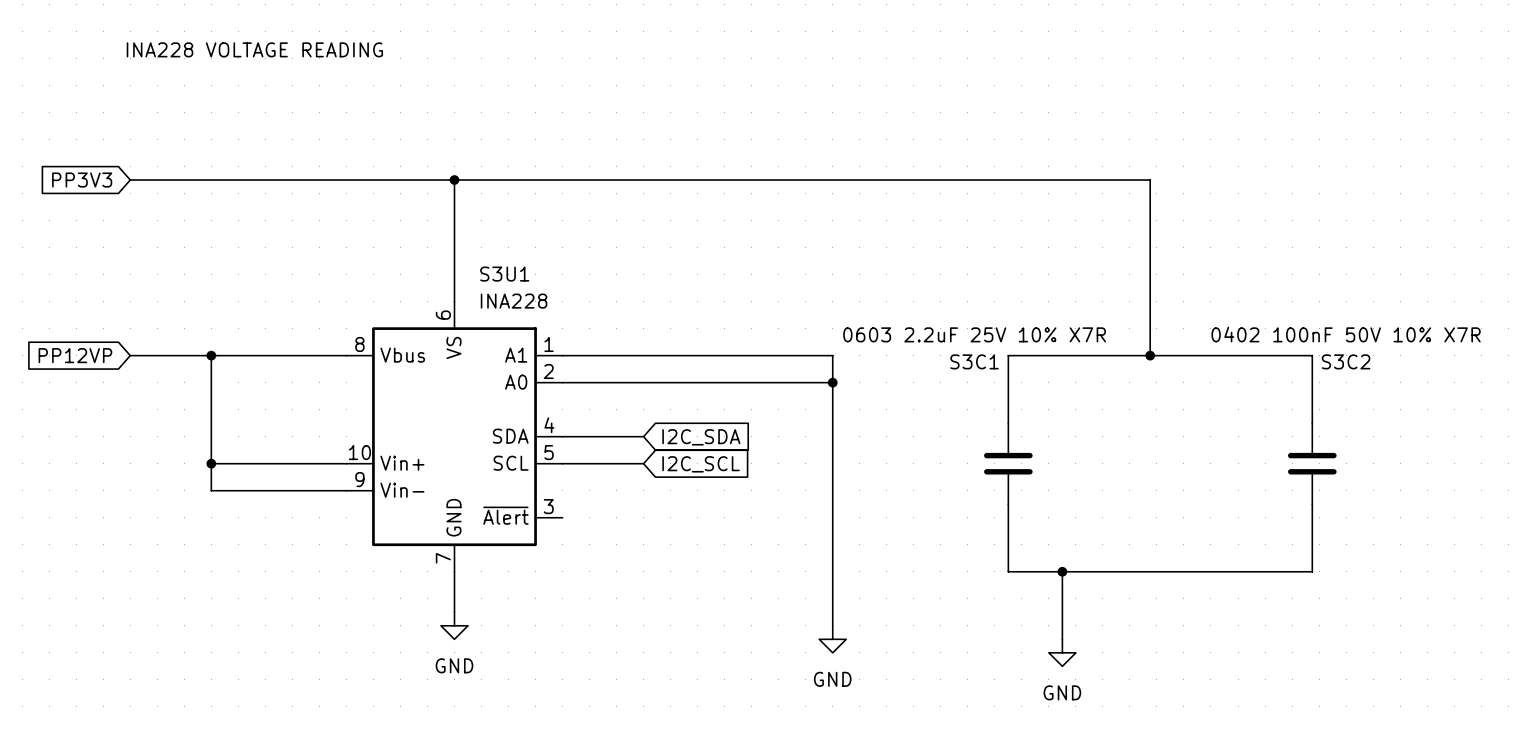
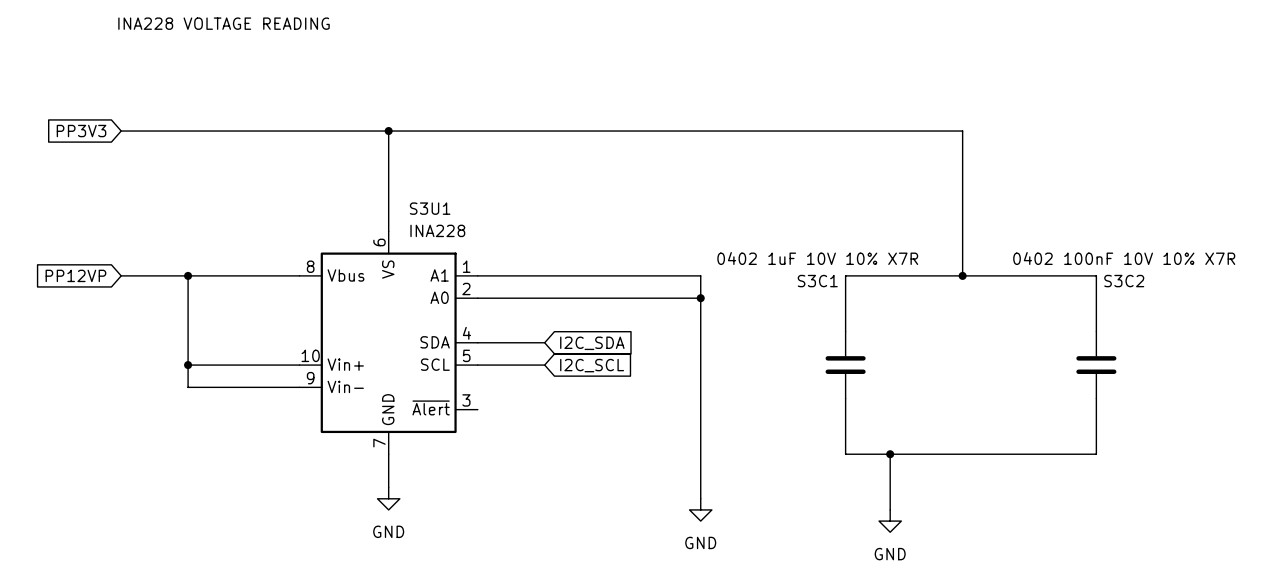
S3C1 value: 0603 2.2uF 25V 10% X7R (974, 334) -> 0402 1uF 10V 10% X7R (817, 258)
S3C2 value: 0402 100nF 50V 10% X7R (1346, 334) -> 0402 100nF 10V 10% X7R (1124, 258)

